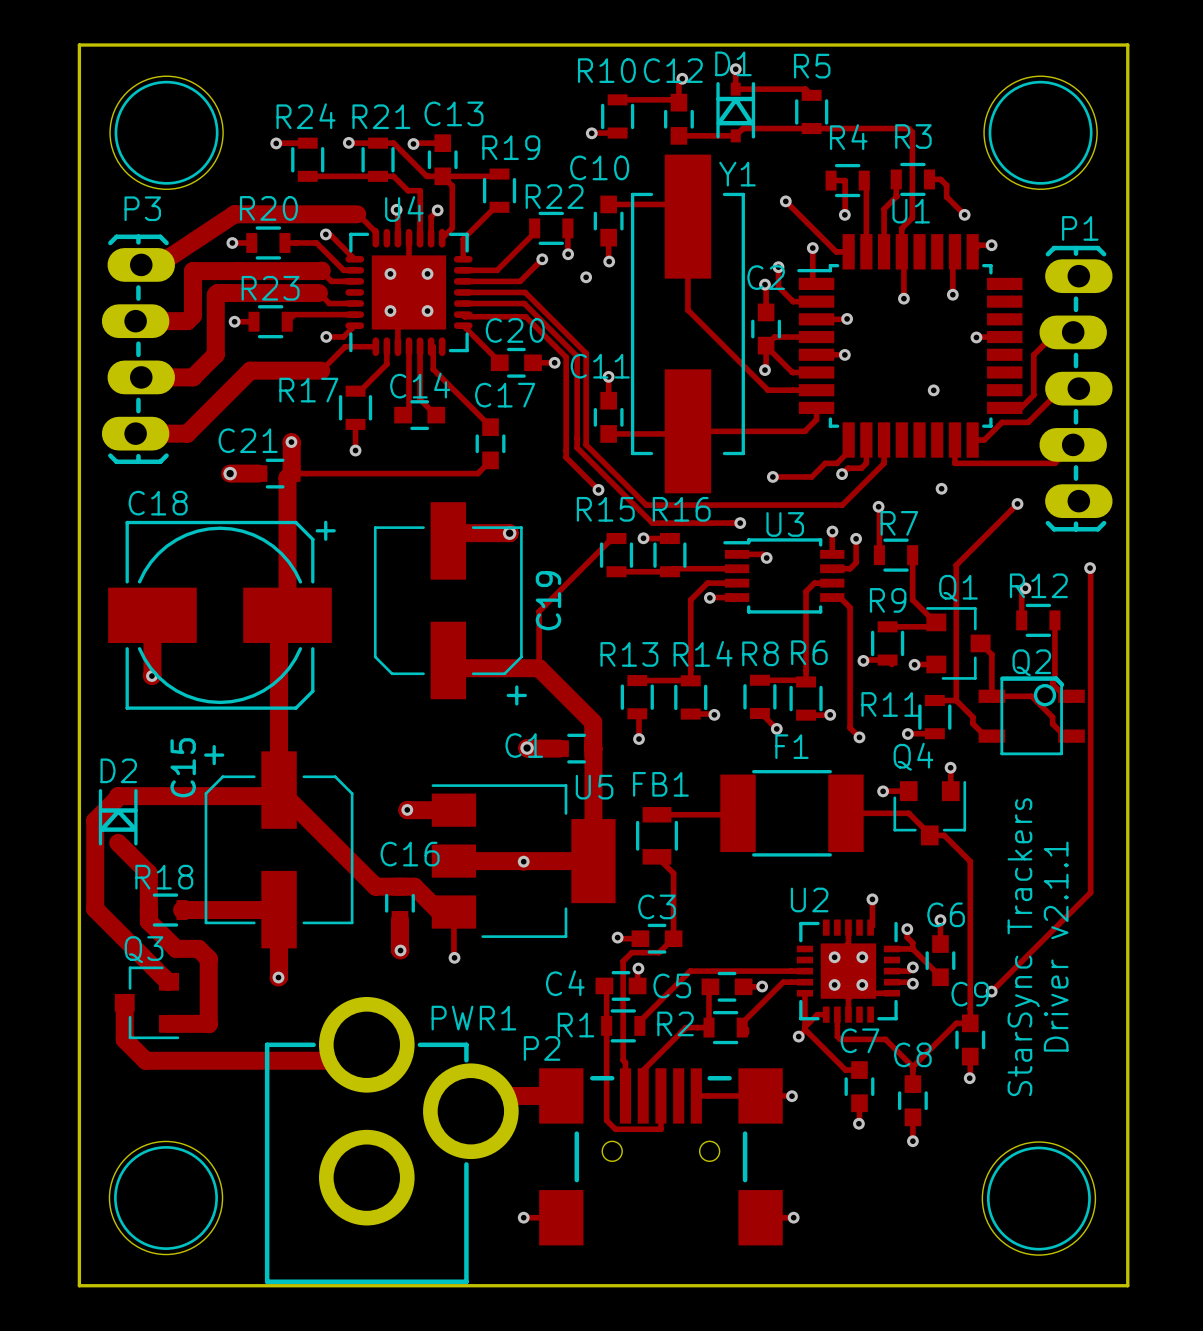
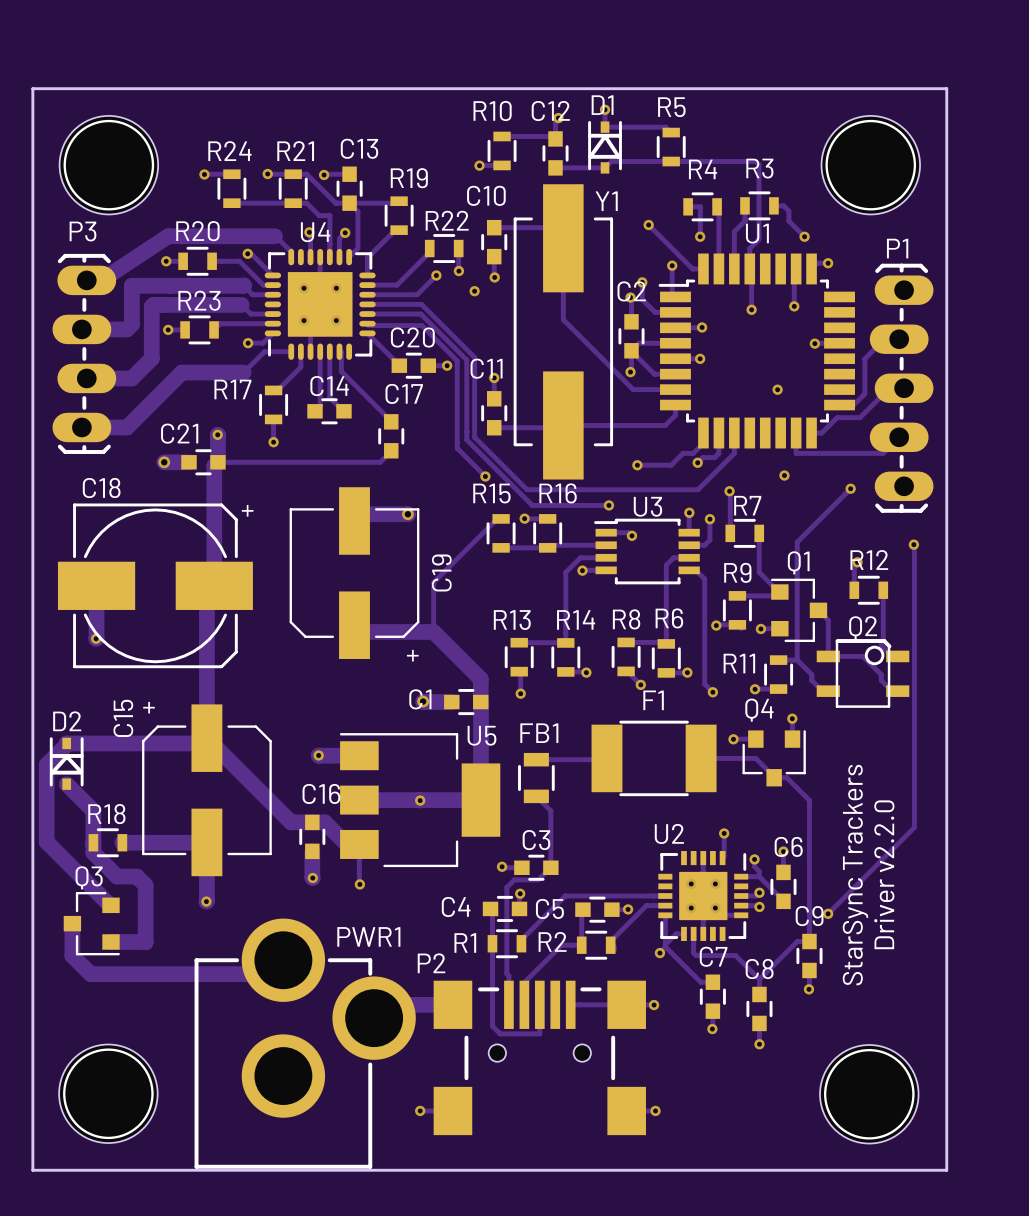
text: Driver v2.1.1 (1056, 946) -> Driver v2.2.0 (884, 874)

